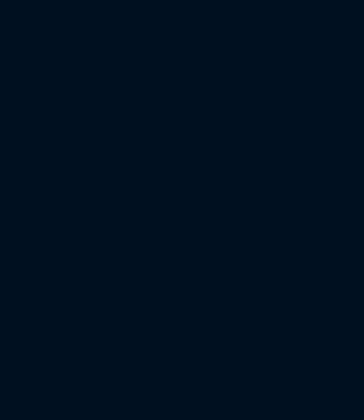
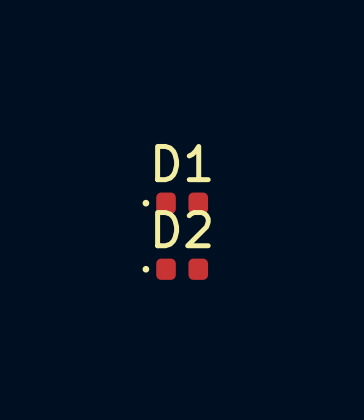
D1: none -> (175, 203)
D2: none -> (175, 269)

